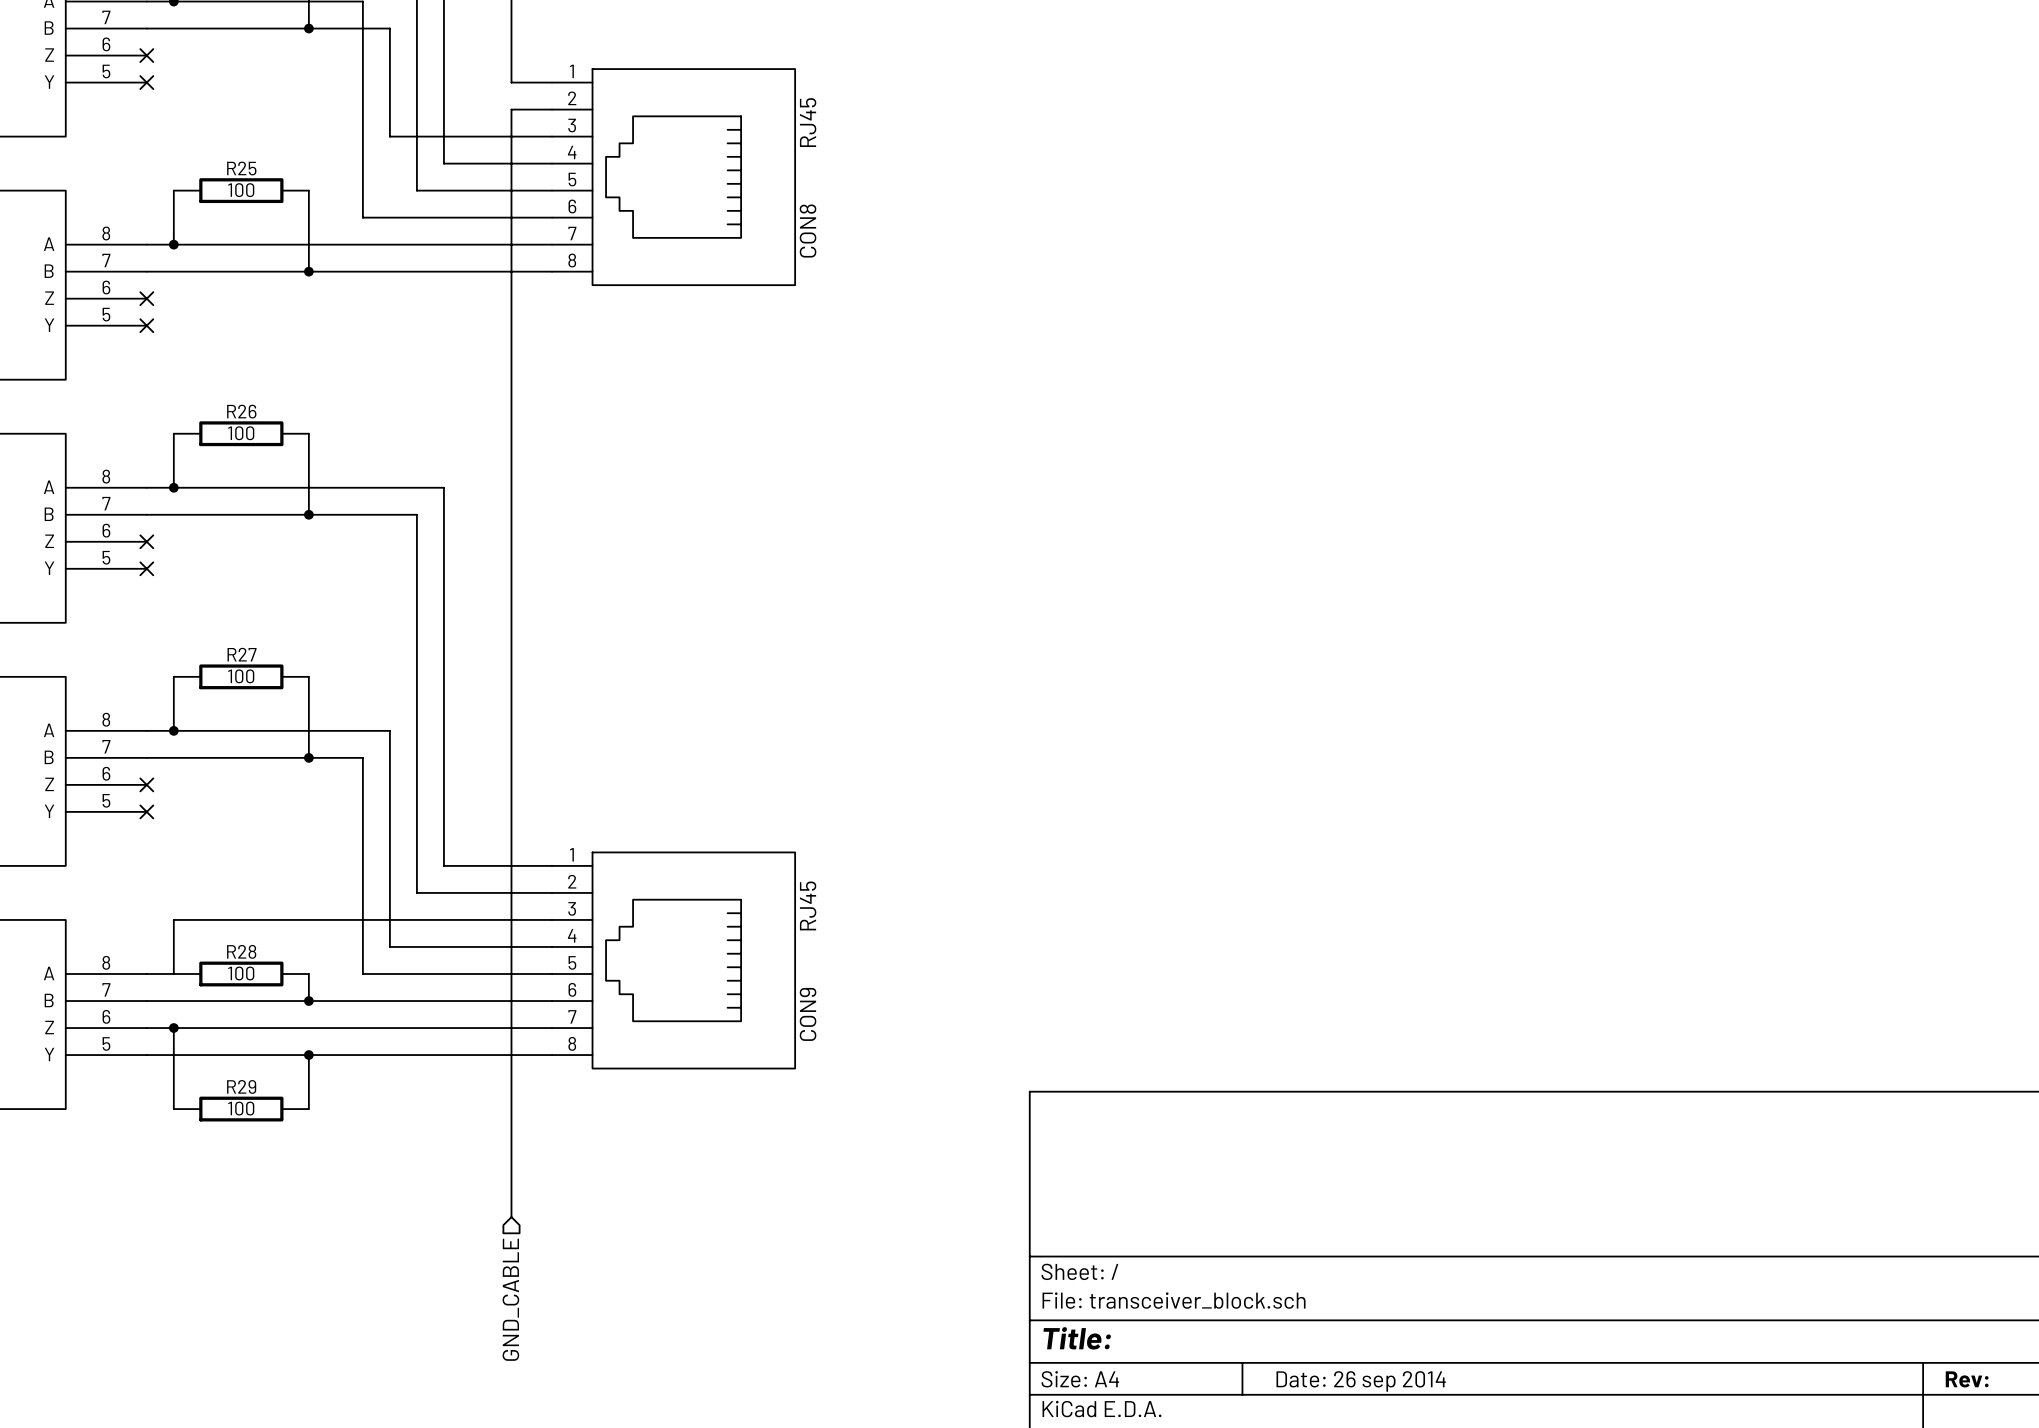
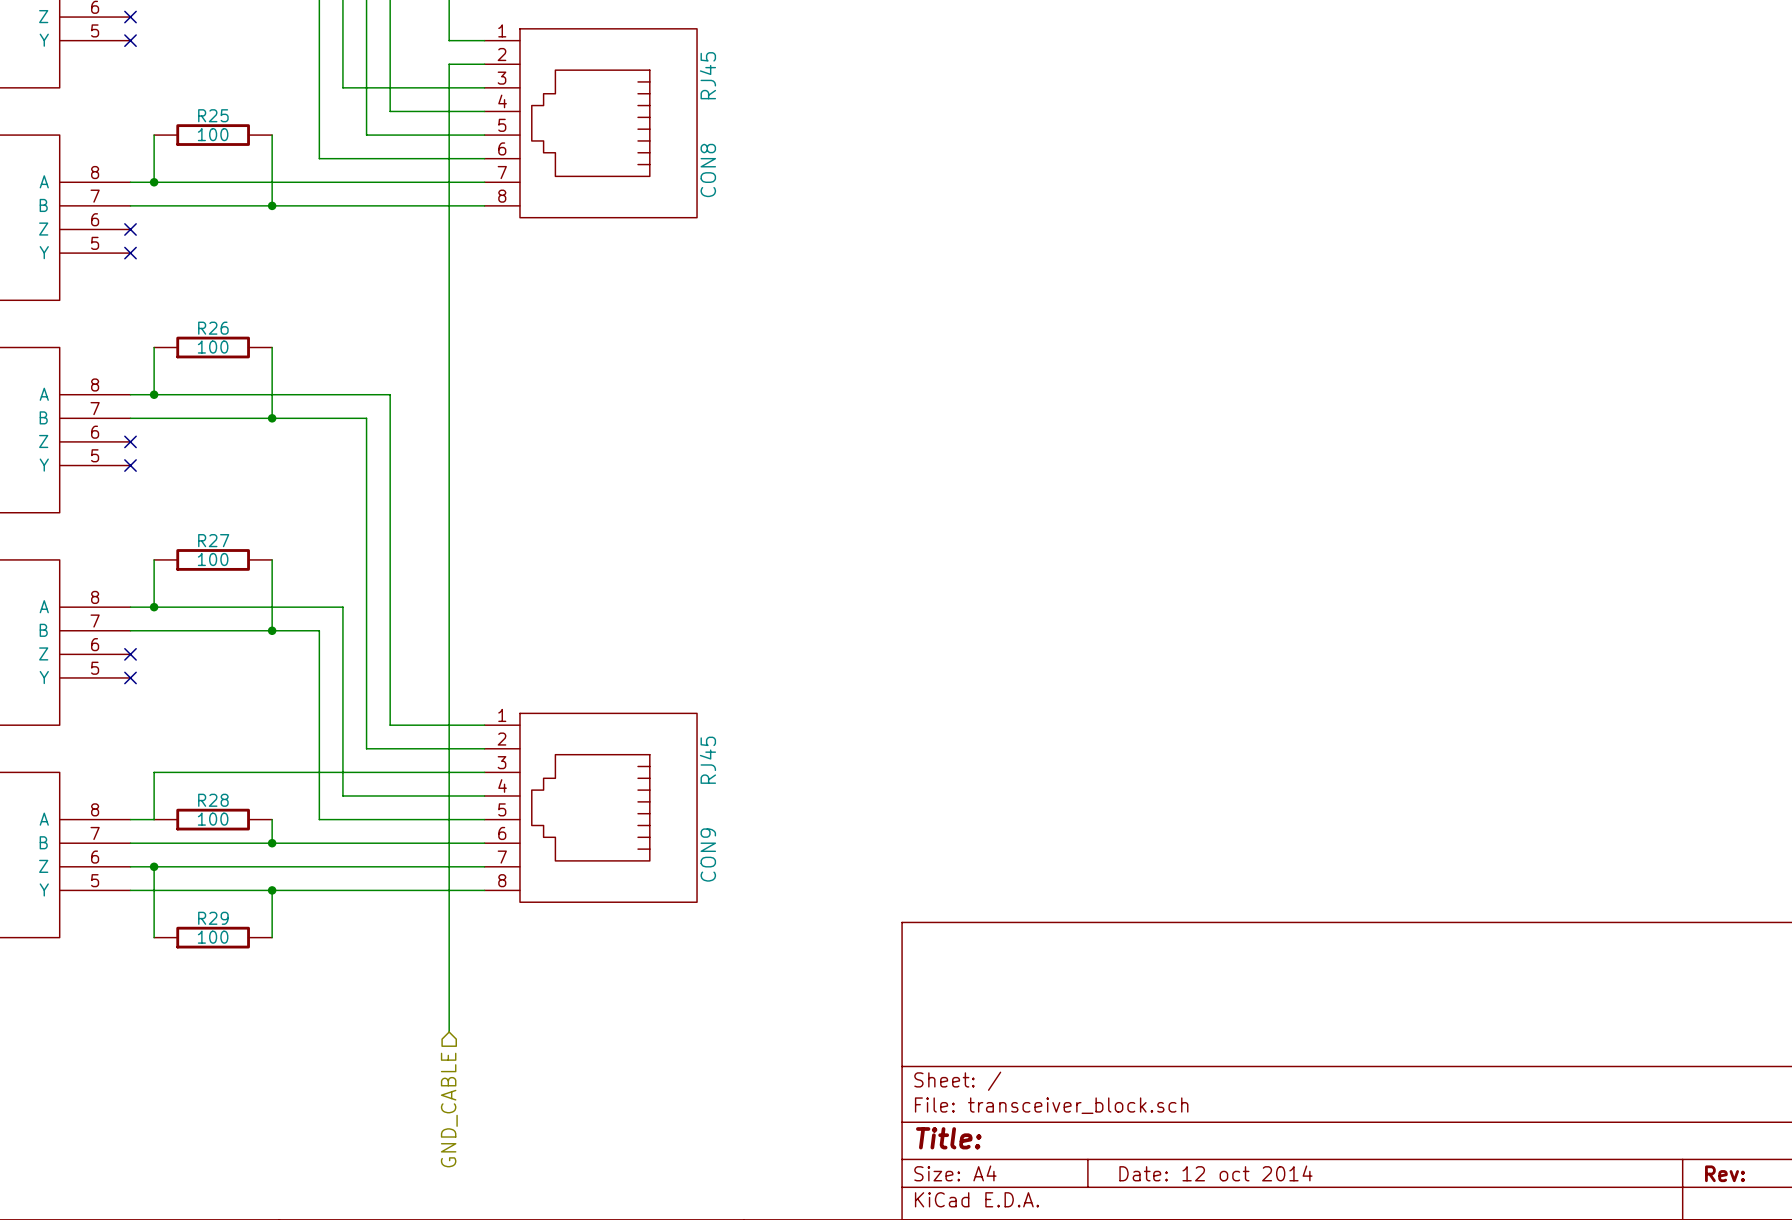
title block: Date: 26 sep 2014 (1361, 1381) -> Date: 12 oct 2014 (1215, 1173)

